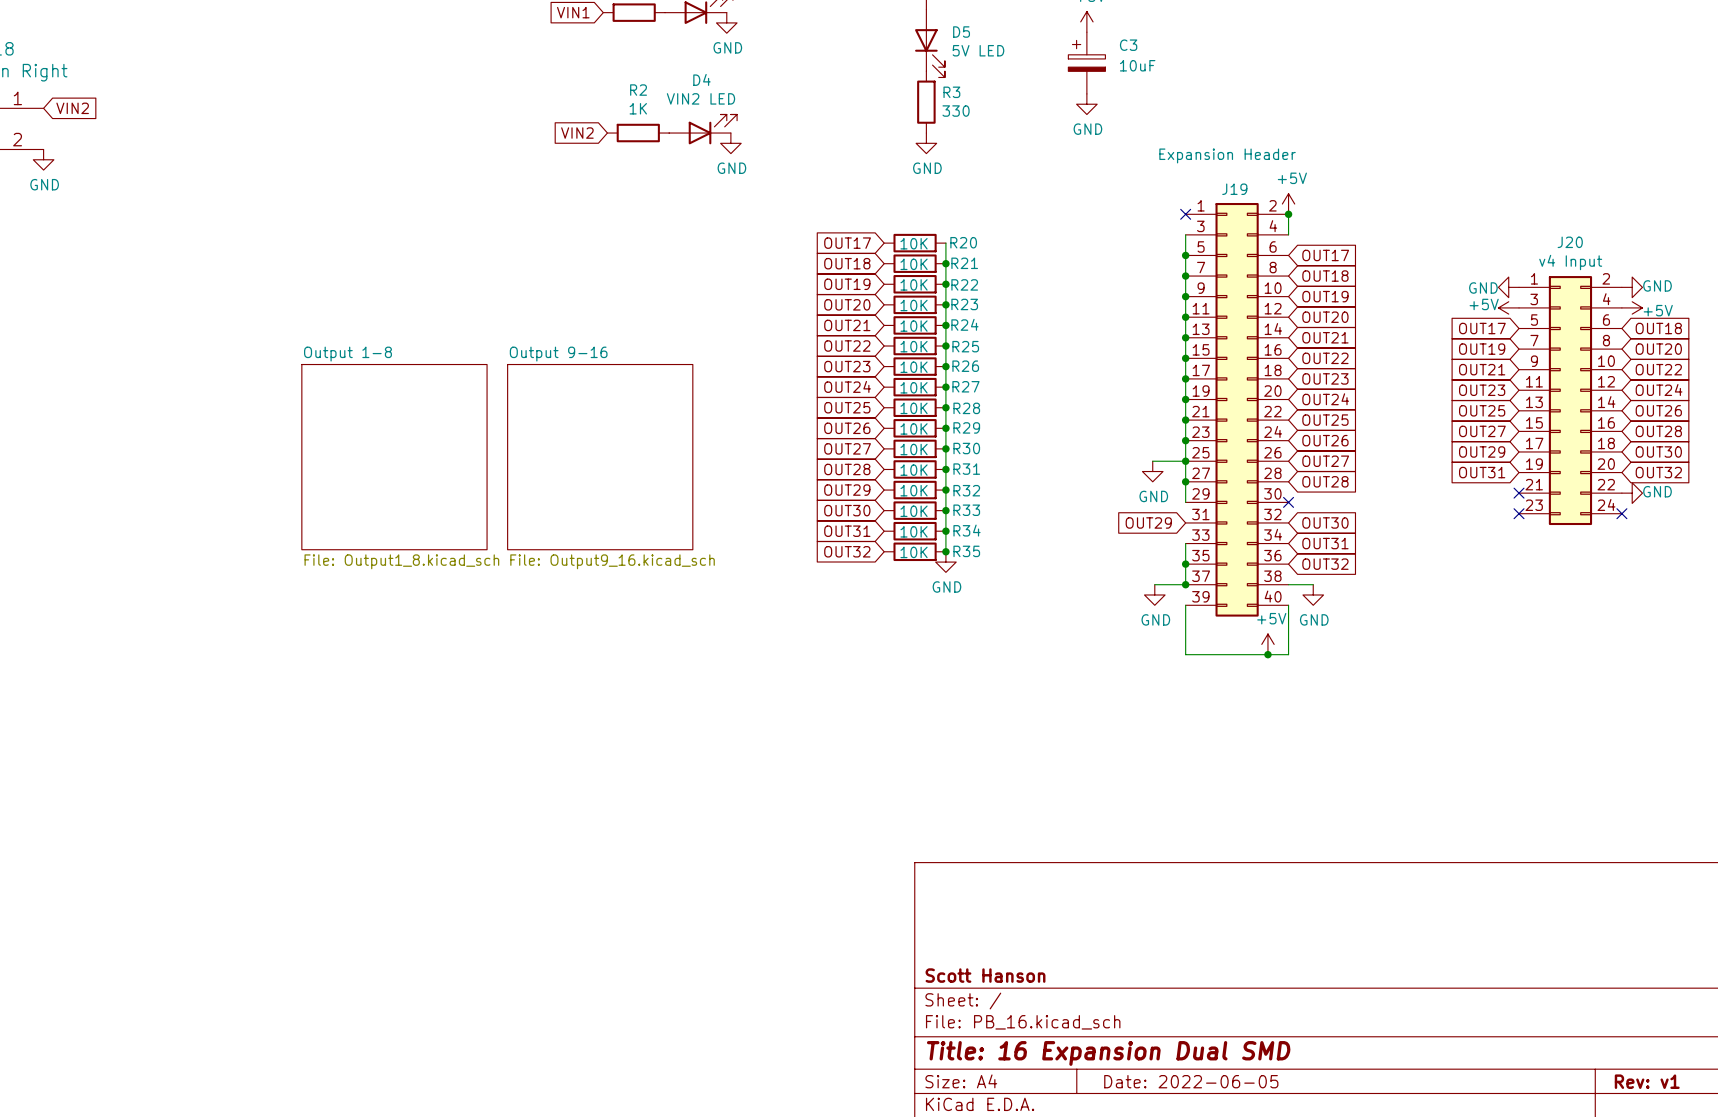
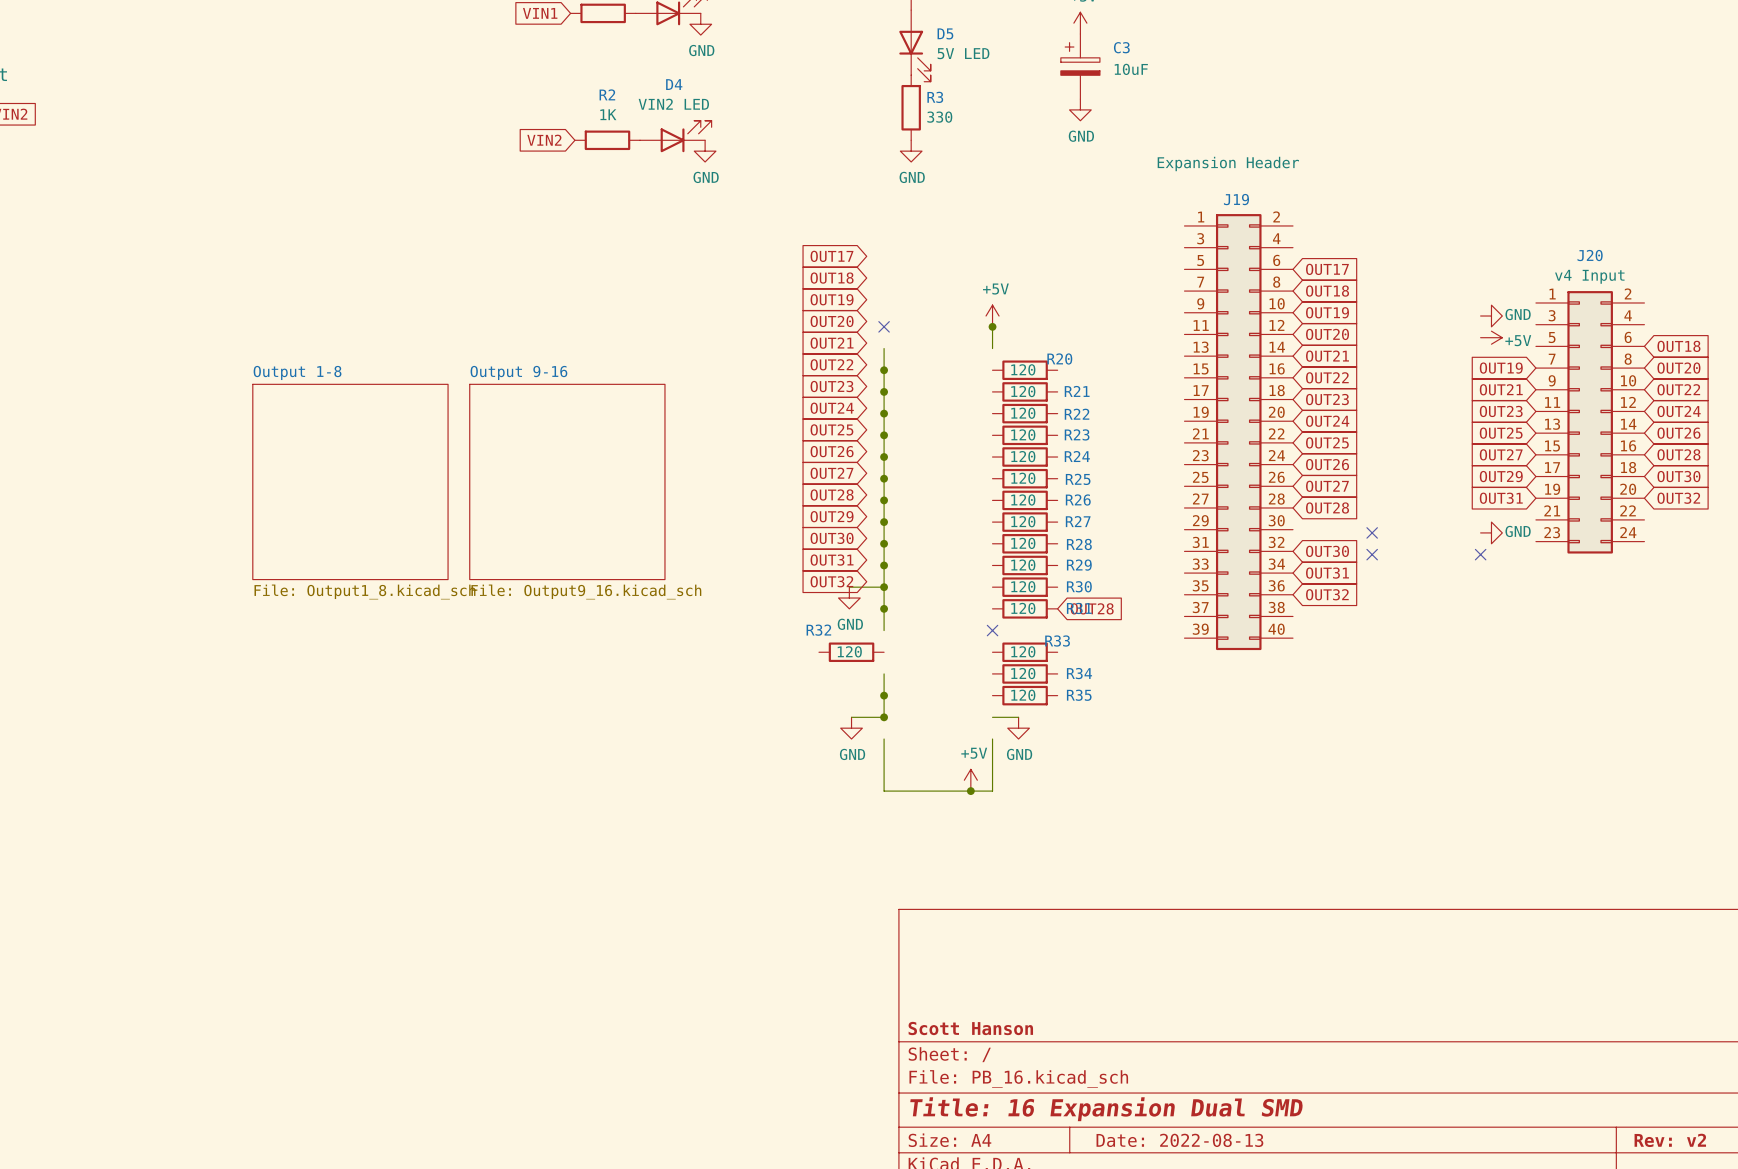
power symbol: +5V (1288, 204) -> none
no-connect mark: (1185, 214) -> none
wire: (1288, 214) (1288, 234) -> none
junction: (1288, 214) -> none
wire: (1185, 234) (1185, 502) -> none
R20 name position: R20 (963, 242) -> R20 (1059, 358)
R20 value: 10K (914, 243) -> 120 (1023, 369)
R20 position: (915, 243) -> (1025, 370)
wire: (945, 243) (945, 551) -> none
junction: (1185, 255) -> none
R21 position: (915, 263) -> (1025, 391)
junction: (945, 263) -> none
R21 value: 10K (914, 264) -> 120 (1023, 391)
junction: (1185, 276) -> none
R22 value: 10K (914, 284) -> 120 (1023, 413)
R22 position: (915, 284) -> (1025, 413)
junction: (945, 284) -> none
power symbol rotation: 0° (1508, 287) -> 180° (1491, 316)
power symbol position: GND (1508, 287) -> GND (1491, 316)
power symbol: GND (1632, 287) -> none
junction: (1185, 296) -> none
power symbol: none -> +5V (992, 316)
R23 position: (915, 304) -> (1025, 435)
junction: (945, 304) -> none
R23 value: 10K (914, 305) -> 120 (1023, 434)
power symbol rotation: 0° (1508, 307) -> 180° (1491, 337)
power symbol position: +5V (1508, 307) -> +5V (1491, 337)
power symbol: +5V (1632, 307) -> none
no-connect mark: none -> (884, 326)
wire: none -> (992, 326) (992, 348)
junction: none -> (992, 326)
junction: (1185, 317) -> none
R24 position: (915, 325) -> (1025, 457)
junction: (945, 325) -> none
R24 value: 10K (914, 326) -> 120 (1023, 456)
global label: OUT17 (1482, 328) -> none
wire: none -> (884, 348) (884, 630)
junction: (1185, 337) -> none
R25 value: 10K (914, 346) -> 120 (1023, 478)
R25 position: (915, 346) -> (1025, 478)
junction: (945, 346) -> none
junction: none -> (884, 370)
junction: (1185, 358) -> none
R26 position: (915, 366) -> (1025, 500)
junction: (945, 366) -> none
R26 value: 10K (914, 367) -> 120 (1023, 500)
junction: none -> (884, 391)
junction: (1185, 378) -> none
R27 value: 10K (914, 387) -> 120 (1023, 521)
R27 position: (915, 387) -> (1025, 522)
junction: (945, 387) -> none
junction: none -> (884, 413)
junction: (1185, 399) -> none
R28 position: (915, 407) -> (1025, 543)
junction: (945, 407) -> none
R28 value: 10K (914, 408) -> 120 (1023, 543)
junction: none -> (884, 435)
junction: (1185, 420) -> none
R29 value: 10K (914, 428) -> 120 (1023, 565)
R29 position: (915, 428) -> (1025, 565)
junction: (945, 428) -> none
junction: none -> (884, 457)
junction: (1185, 440) -> none
R30 position: (915, 448) -> (1025, 587)
junction: (945, 448) -> none
R30 value: 10K (914, 449) -> 120 (1023, 586)
junction: none -> (884, 478)
wire: (1152, 461) (1185, 461) -> none
junction: (1185, 461) -> none
R31 position: (915, 469) -> (1025, 608)
junction: (945, 469) -> none
R31 value: 10K (914, 470) -> 120 (1023, 608)
power symbol: GND (1152, 471) -> none
junction: none -> (884, 500)
junction: (1185, 481) -> none
R32 value: 10K (914, 490) -> 120 (849, 651)
R32 position: (915, 490) -> (851, 652)
junction: (945, 490) -> none
R32 name position: R32 (966, 490) -> R32 (818, 630)
no-connect mark: (1519, 493) -> none
power symbol: GND (1632, 493) -> none
junction: none -> (884, 522)
no-connect mark: (1288, 502) -> none
no-connect mark: none -> (1372, 532)
power symbol: none -> GND (1491, 532)
R33 position: (915, 510) -> (1025, 652)
junction: (945, 510) -> none
R33 name position: R33 (966, 510) -> R33 (1057, 641)
R33 value: 10K (914, 511) -> 120 (1023, 651)
no-connect mark: (1519, 513) -> none
no-connect mark: (1621, 513) -> none
junction: none -> (884, 543)
global label: OUT29 (1148, 522) -> none
no-connect mark: none -> (1372, 554)
no-connect mark: none -> (1480, 554)
R34 value: 10K (914, 531) -> 120 (1023, 673)
R34 position: (915, 531) -> (1025, 673)
junction: (945, 531) -> none
junction: none -> (884, 565)
wire: (1185, 543) (1185, 584) (1154, 584) -> none
R35 position: (915, 551) -> (1025, 695)
junction: (945, 551) -> none
R35 value: 10K (914, 552) -> 120 (1023, 695)
wire: none -> (849, 587) (884, 587)
junction: none -> (884, 587)
power symbol: GND (945, 562) -> none
junction: (1185, 564) -> none
power symbol: none -> GND (849, 598)
junction: none -> (884, 608)
global label: none -> OUT28 (1092, 608)
junction: (1185, 584) -> none
wire: (1288, 584) (1313, 584) -> none
power symbol: GND (1154, 594) -> none
power symbol: GND (1313, 594) -> none
no-connect mark: none -> (992, 630)
wire: (1185, 605) (1185, 654) (1288, 654) (1288, 605) -> none
wire: none -> (884, 673) (884, 717) (851, 717)
power symbol: +5V (1267, 644) -> none
junction: (1267, 654) -> none
junction: none -> (884, 695)
junction: none -> (884, 717)
wire: none -> (992, 717) (1018, 717)
power symbol: none -> GND (851, 728)
power symbol: none -> GND (1018, 728)
wire: none -> (884, 739) (884, 791) (992, 791) (992, 739)
power symbol: none -> +5V (970, 780)
junction: none -> (970, 791)
title block: Date: 2022-06-05 (1191, 1081) -> Date: 2022-08-13 (1179, 1140)
title block: Rev: v1 (1647, 1081) -> Rev: v2 (1670, 1140)

